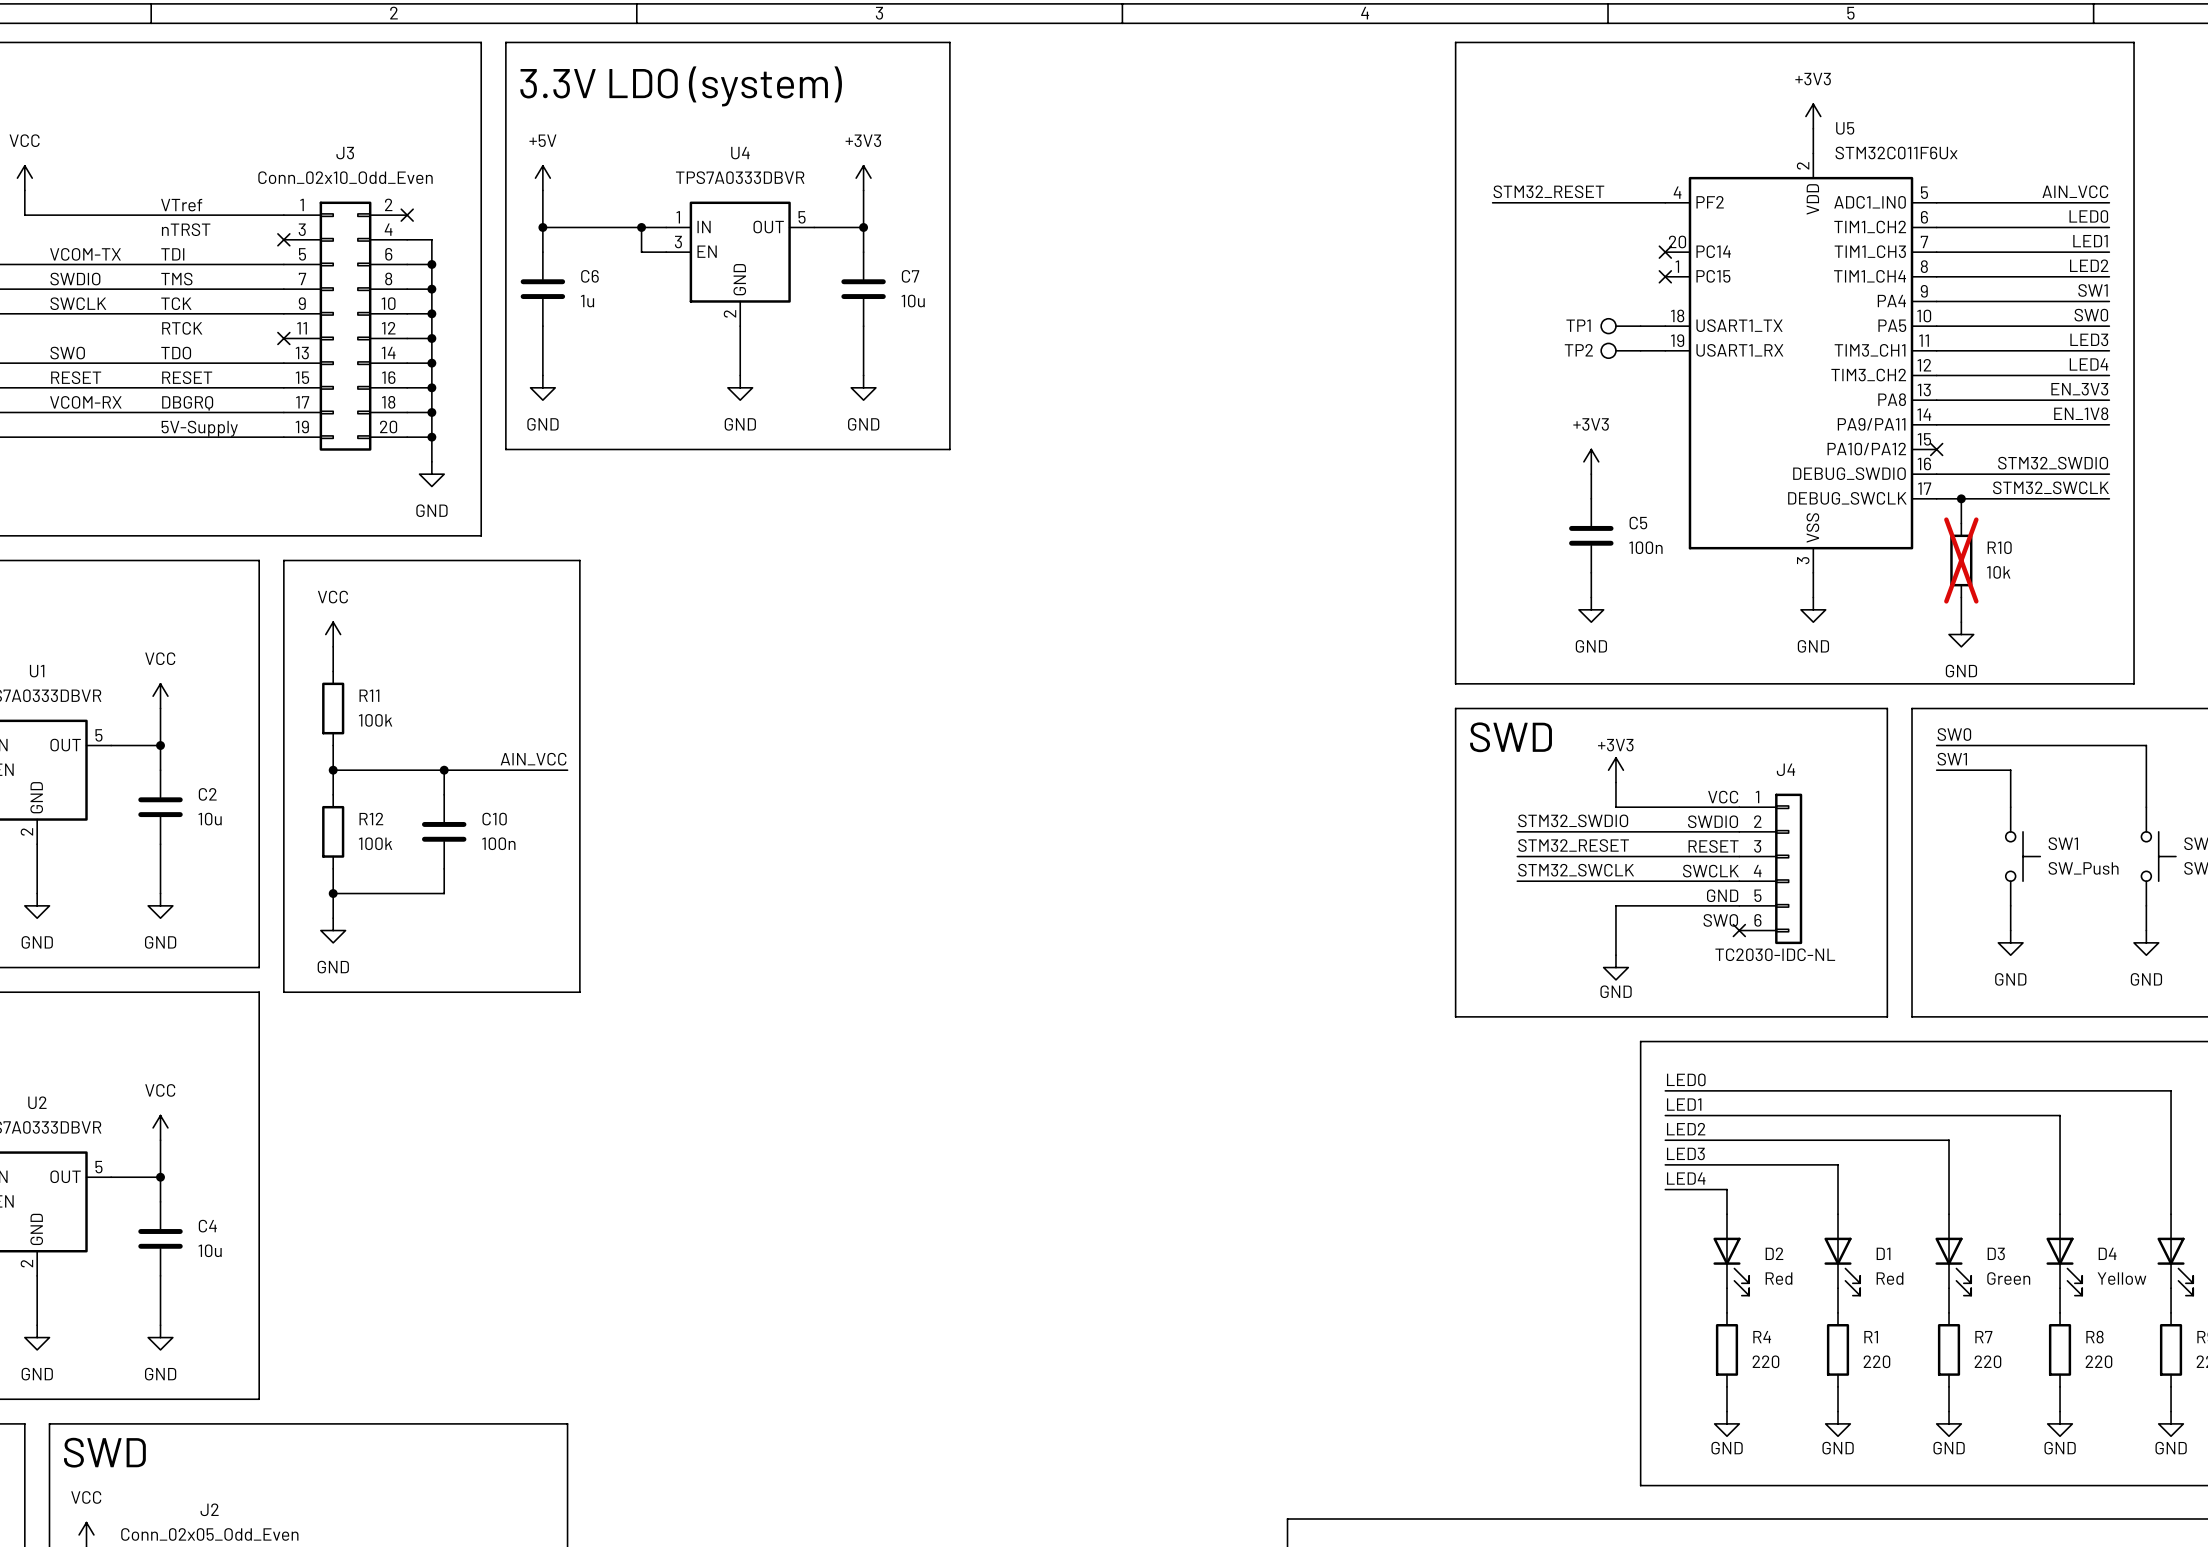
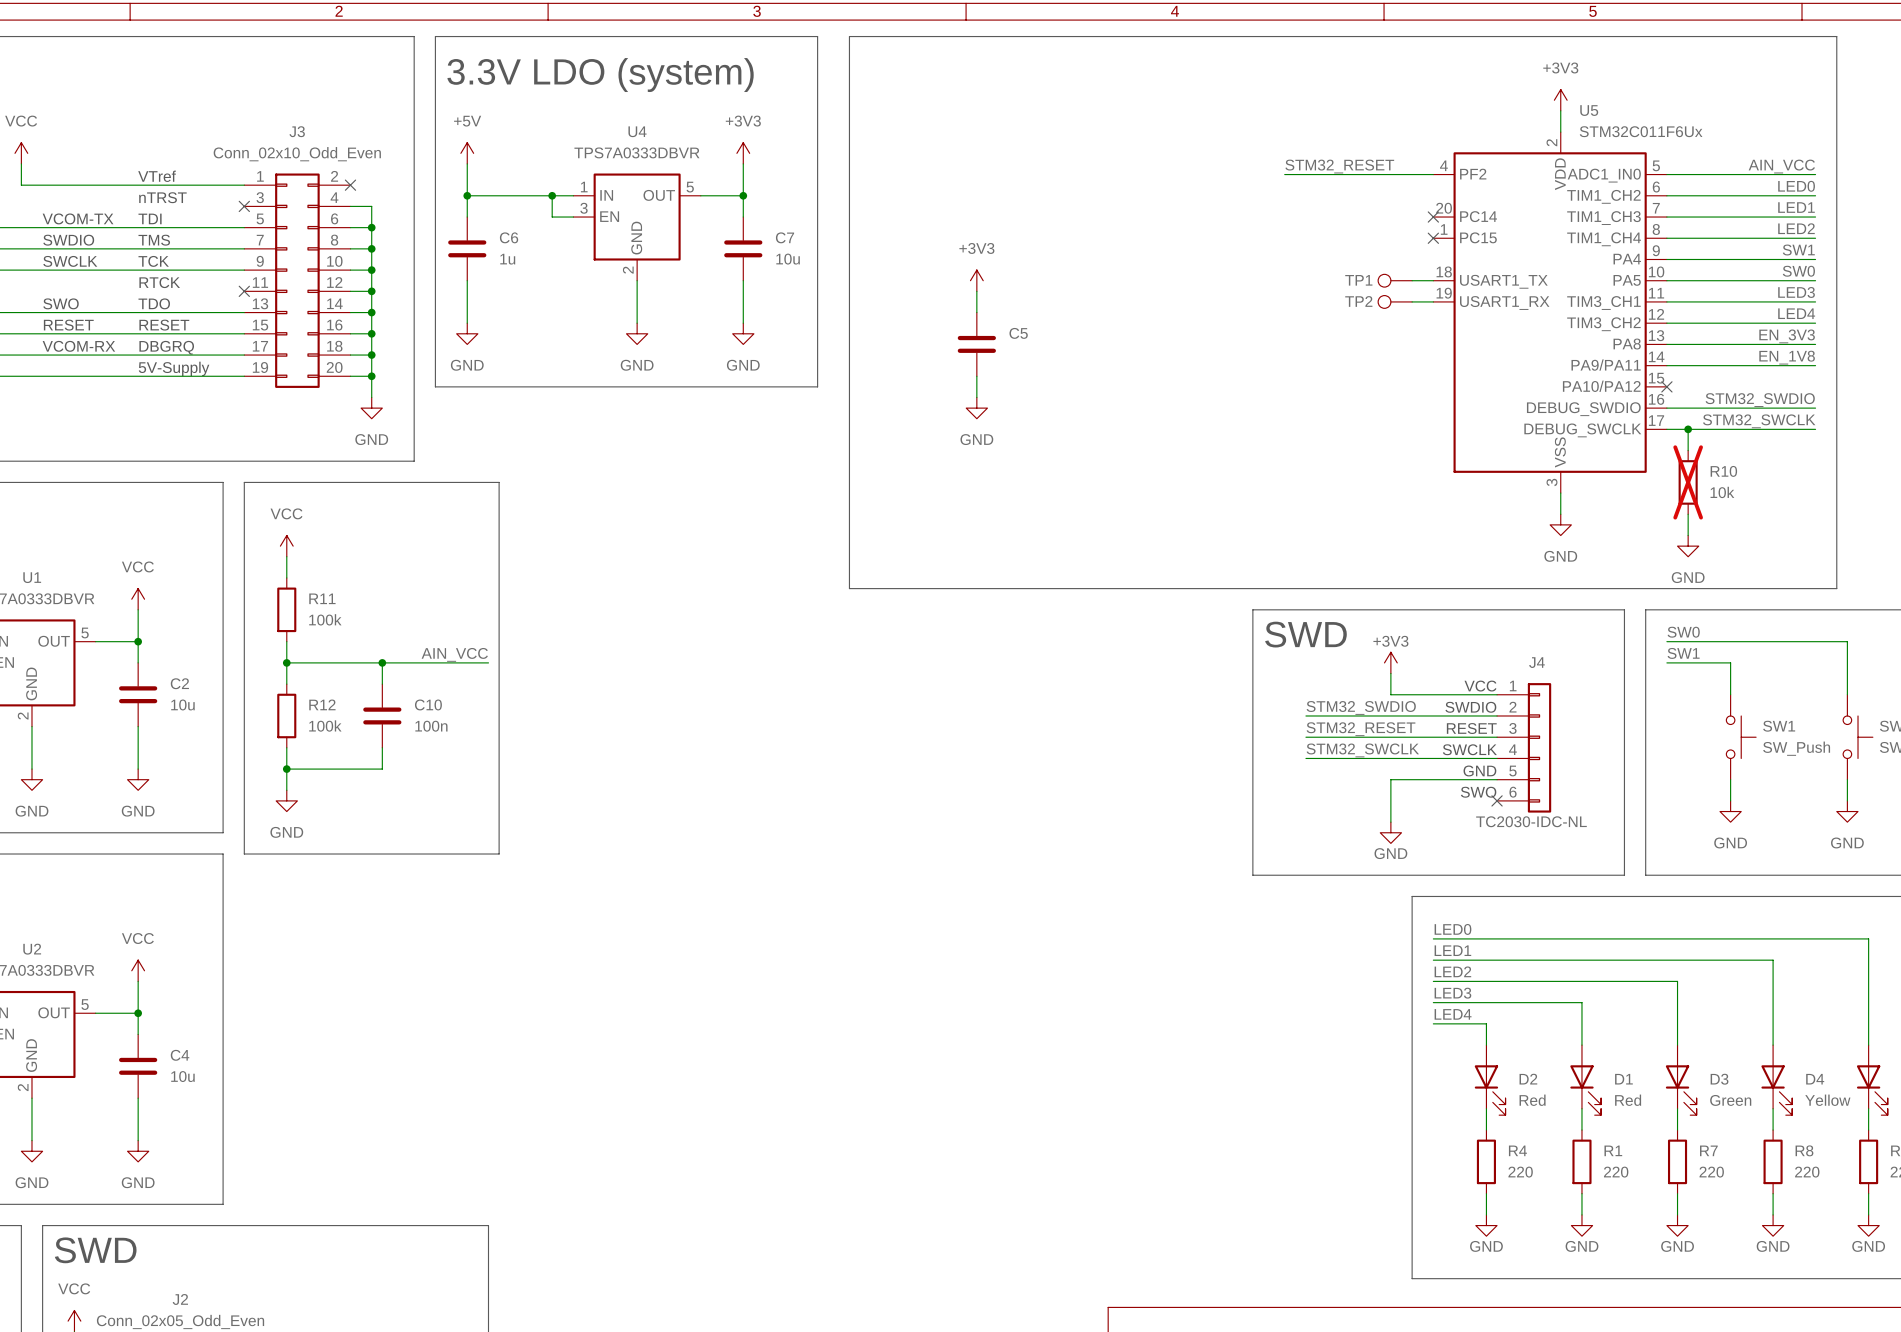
line: (1455, 42) (1455, 683) -> (1252, 36) (849, 36) (849, 588) (1252, 588)
power symbol: none -> +3V3 (976, 280)
wire: none -> (976, 291) (976, 312)
wire: none -> (976, 376) (976, 397)
power symbol: +3V3 (1591, 461) -> none
power symbol: none -> GND (976, 408)
wire: (1591, 474) (1591, 498) -> none
C5 position: (1591, 535) -> (976, 344)
C5 value: 100n (1645, 547) -> none
wire: (1591, 572) (1591, 597) -> none
power symbol: GND (1591, 609) -> none

